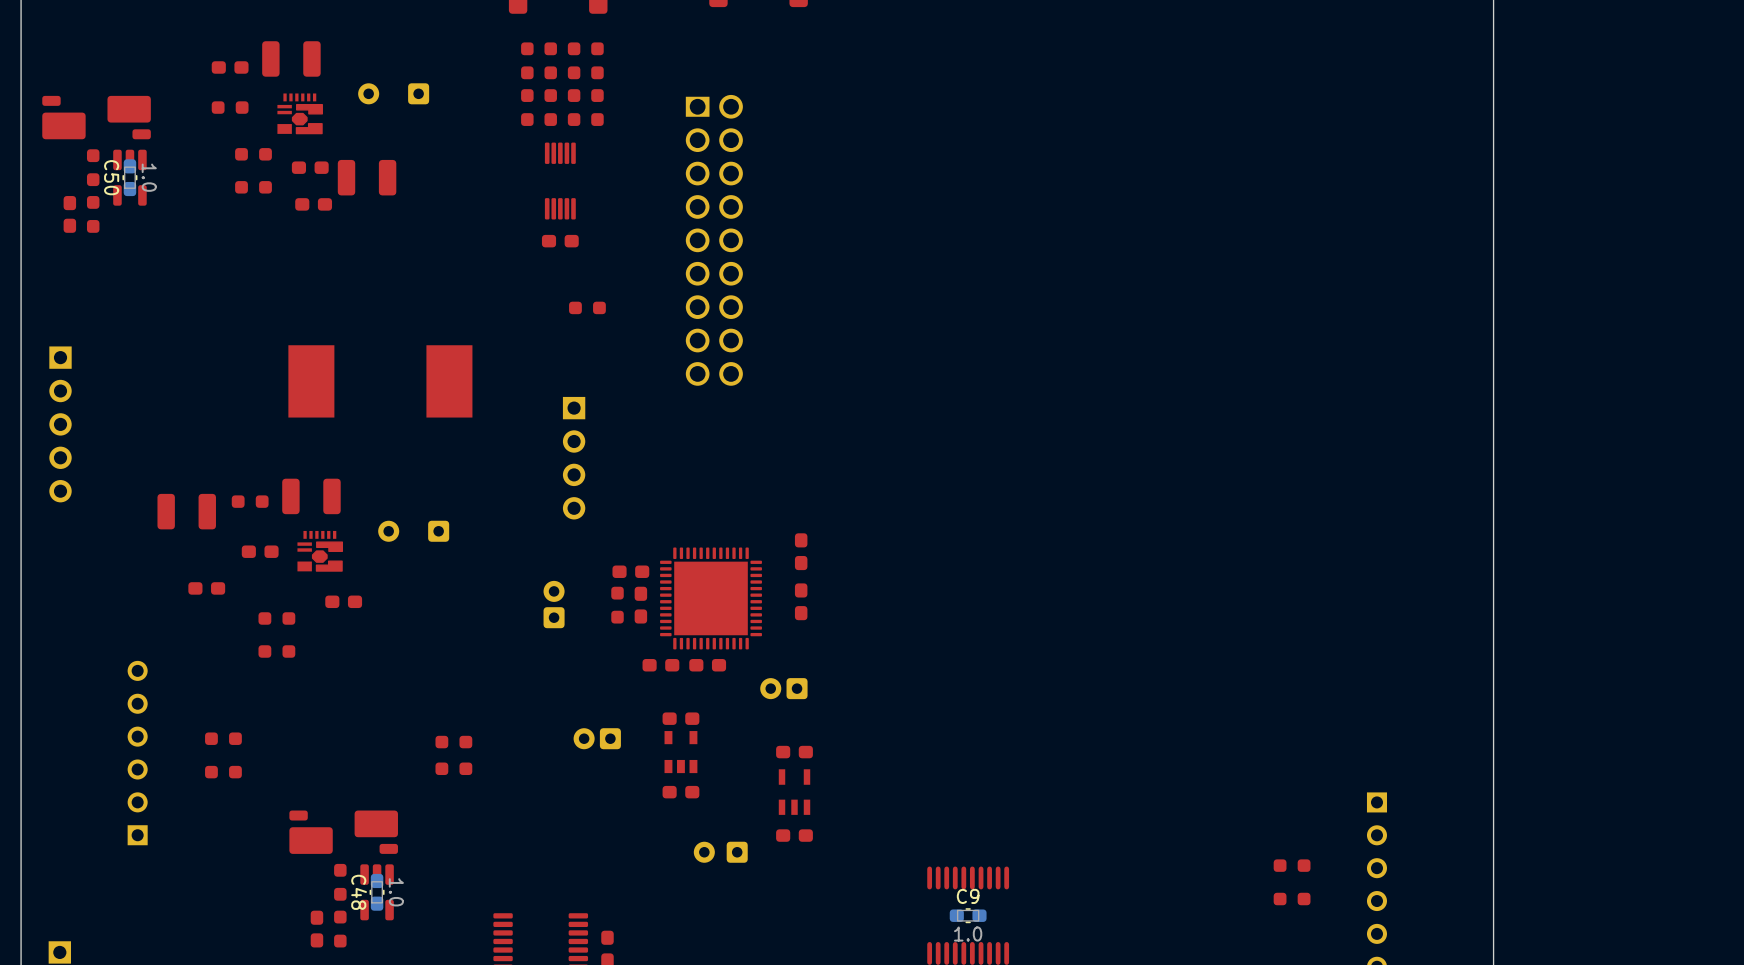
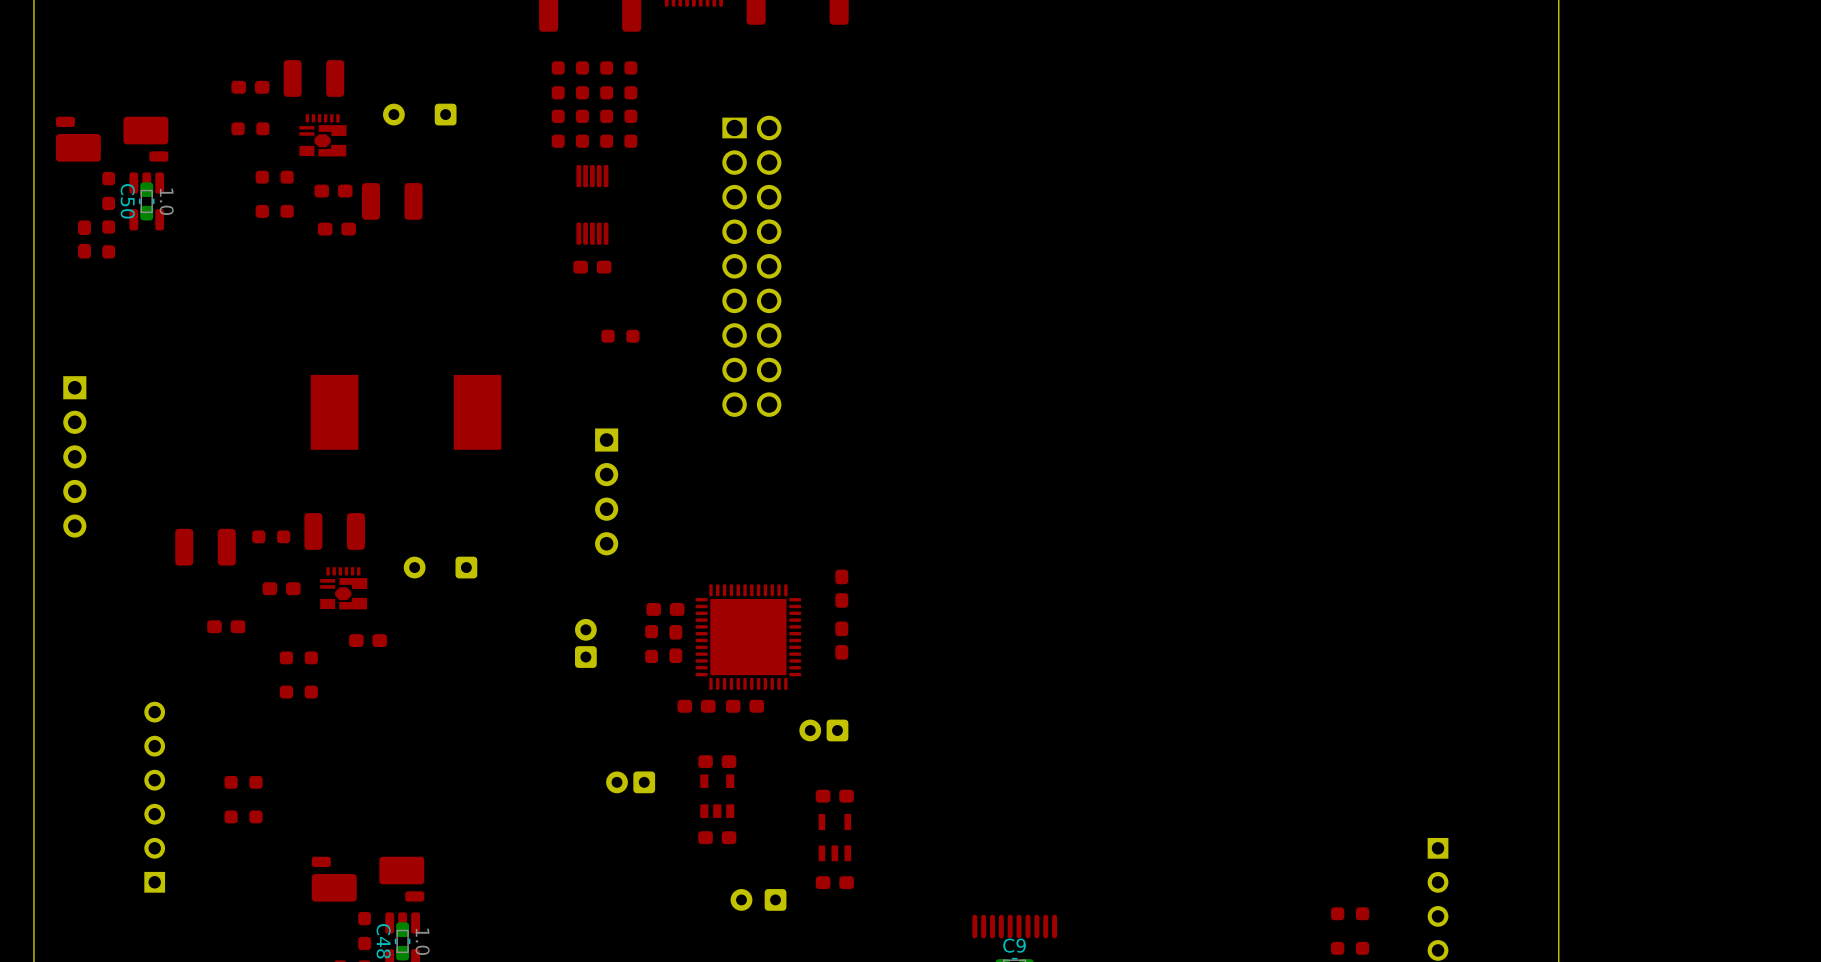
part: (453, 742) -> none
part: (453, 768) -> none

